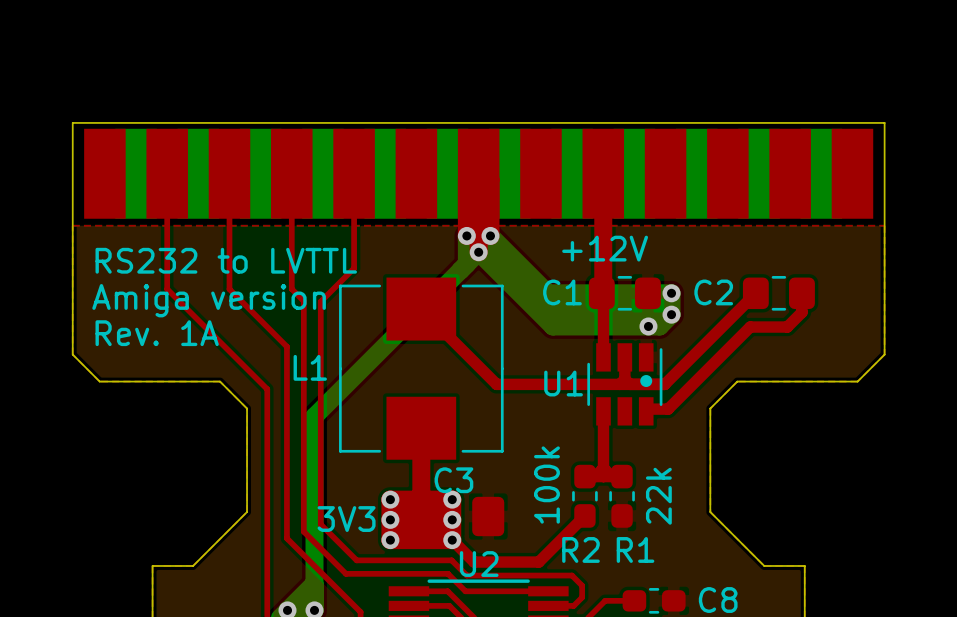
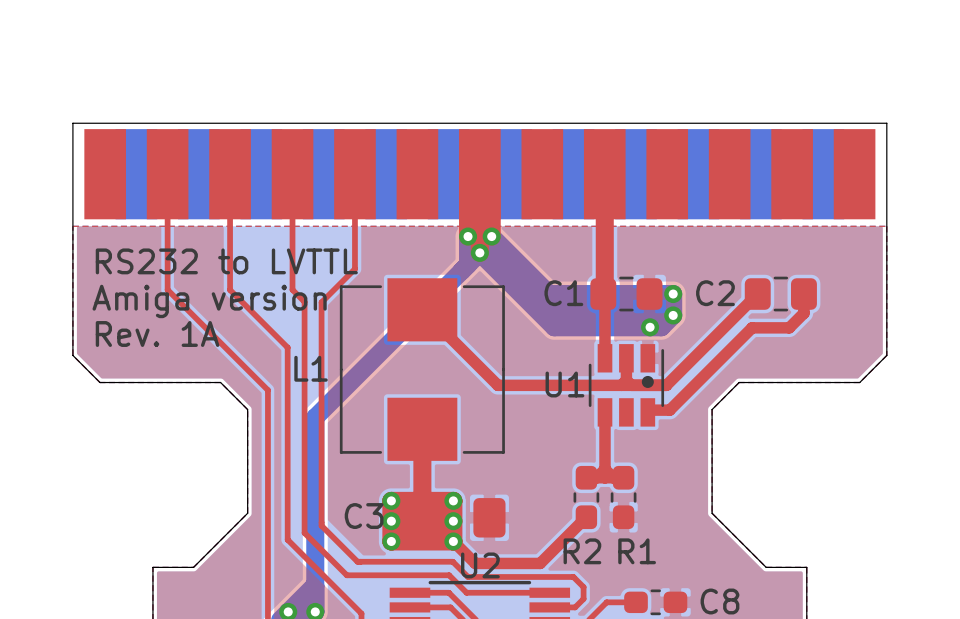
text: +12V (605, 248) -> none
C3 name position: C3 (453, 480) -> C3 (364, 516)
text: 100k (546, 485) -> none
text: 22k (658, 496) -> none
text: 3V3 (346, 519) -> none

